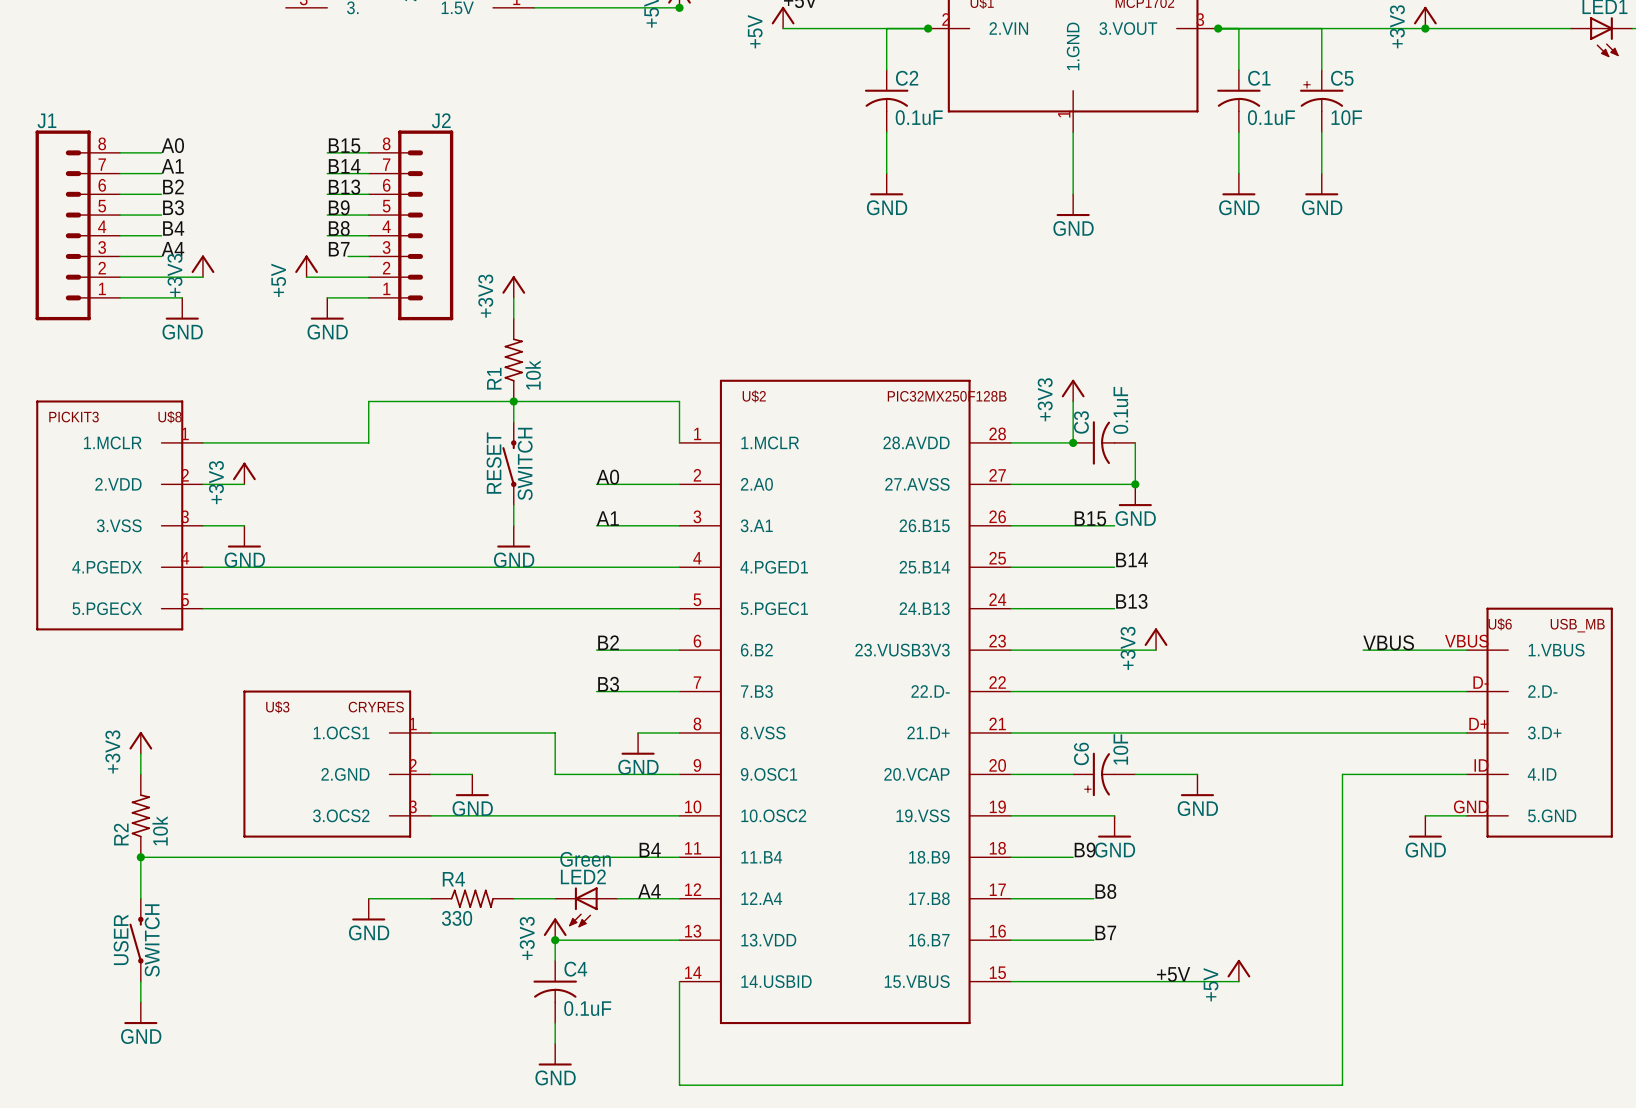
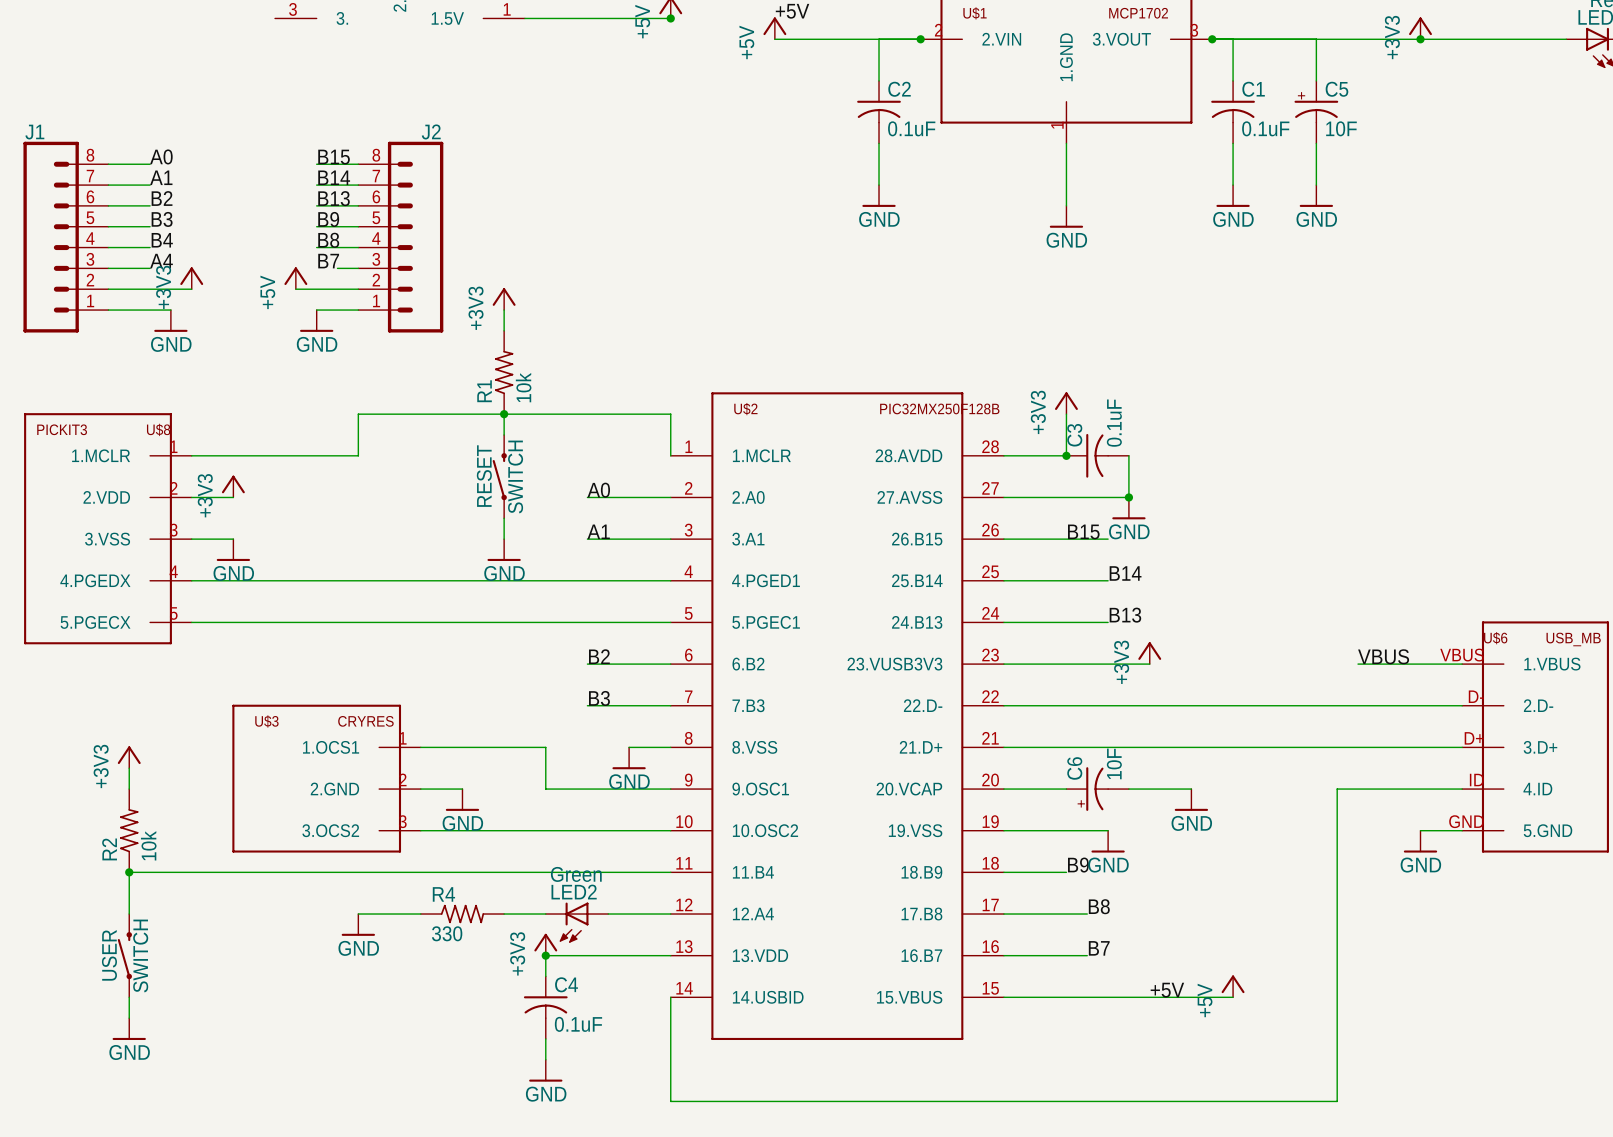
label: B4 (650, 850) -> none
label: A4 (649, 891) -> none

